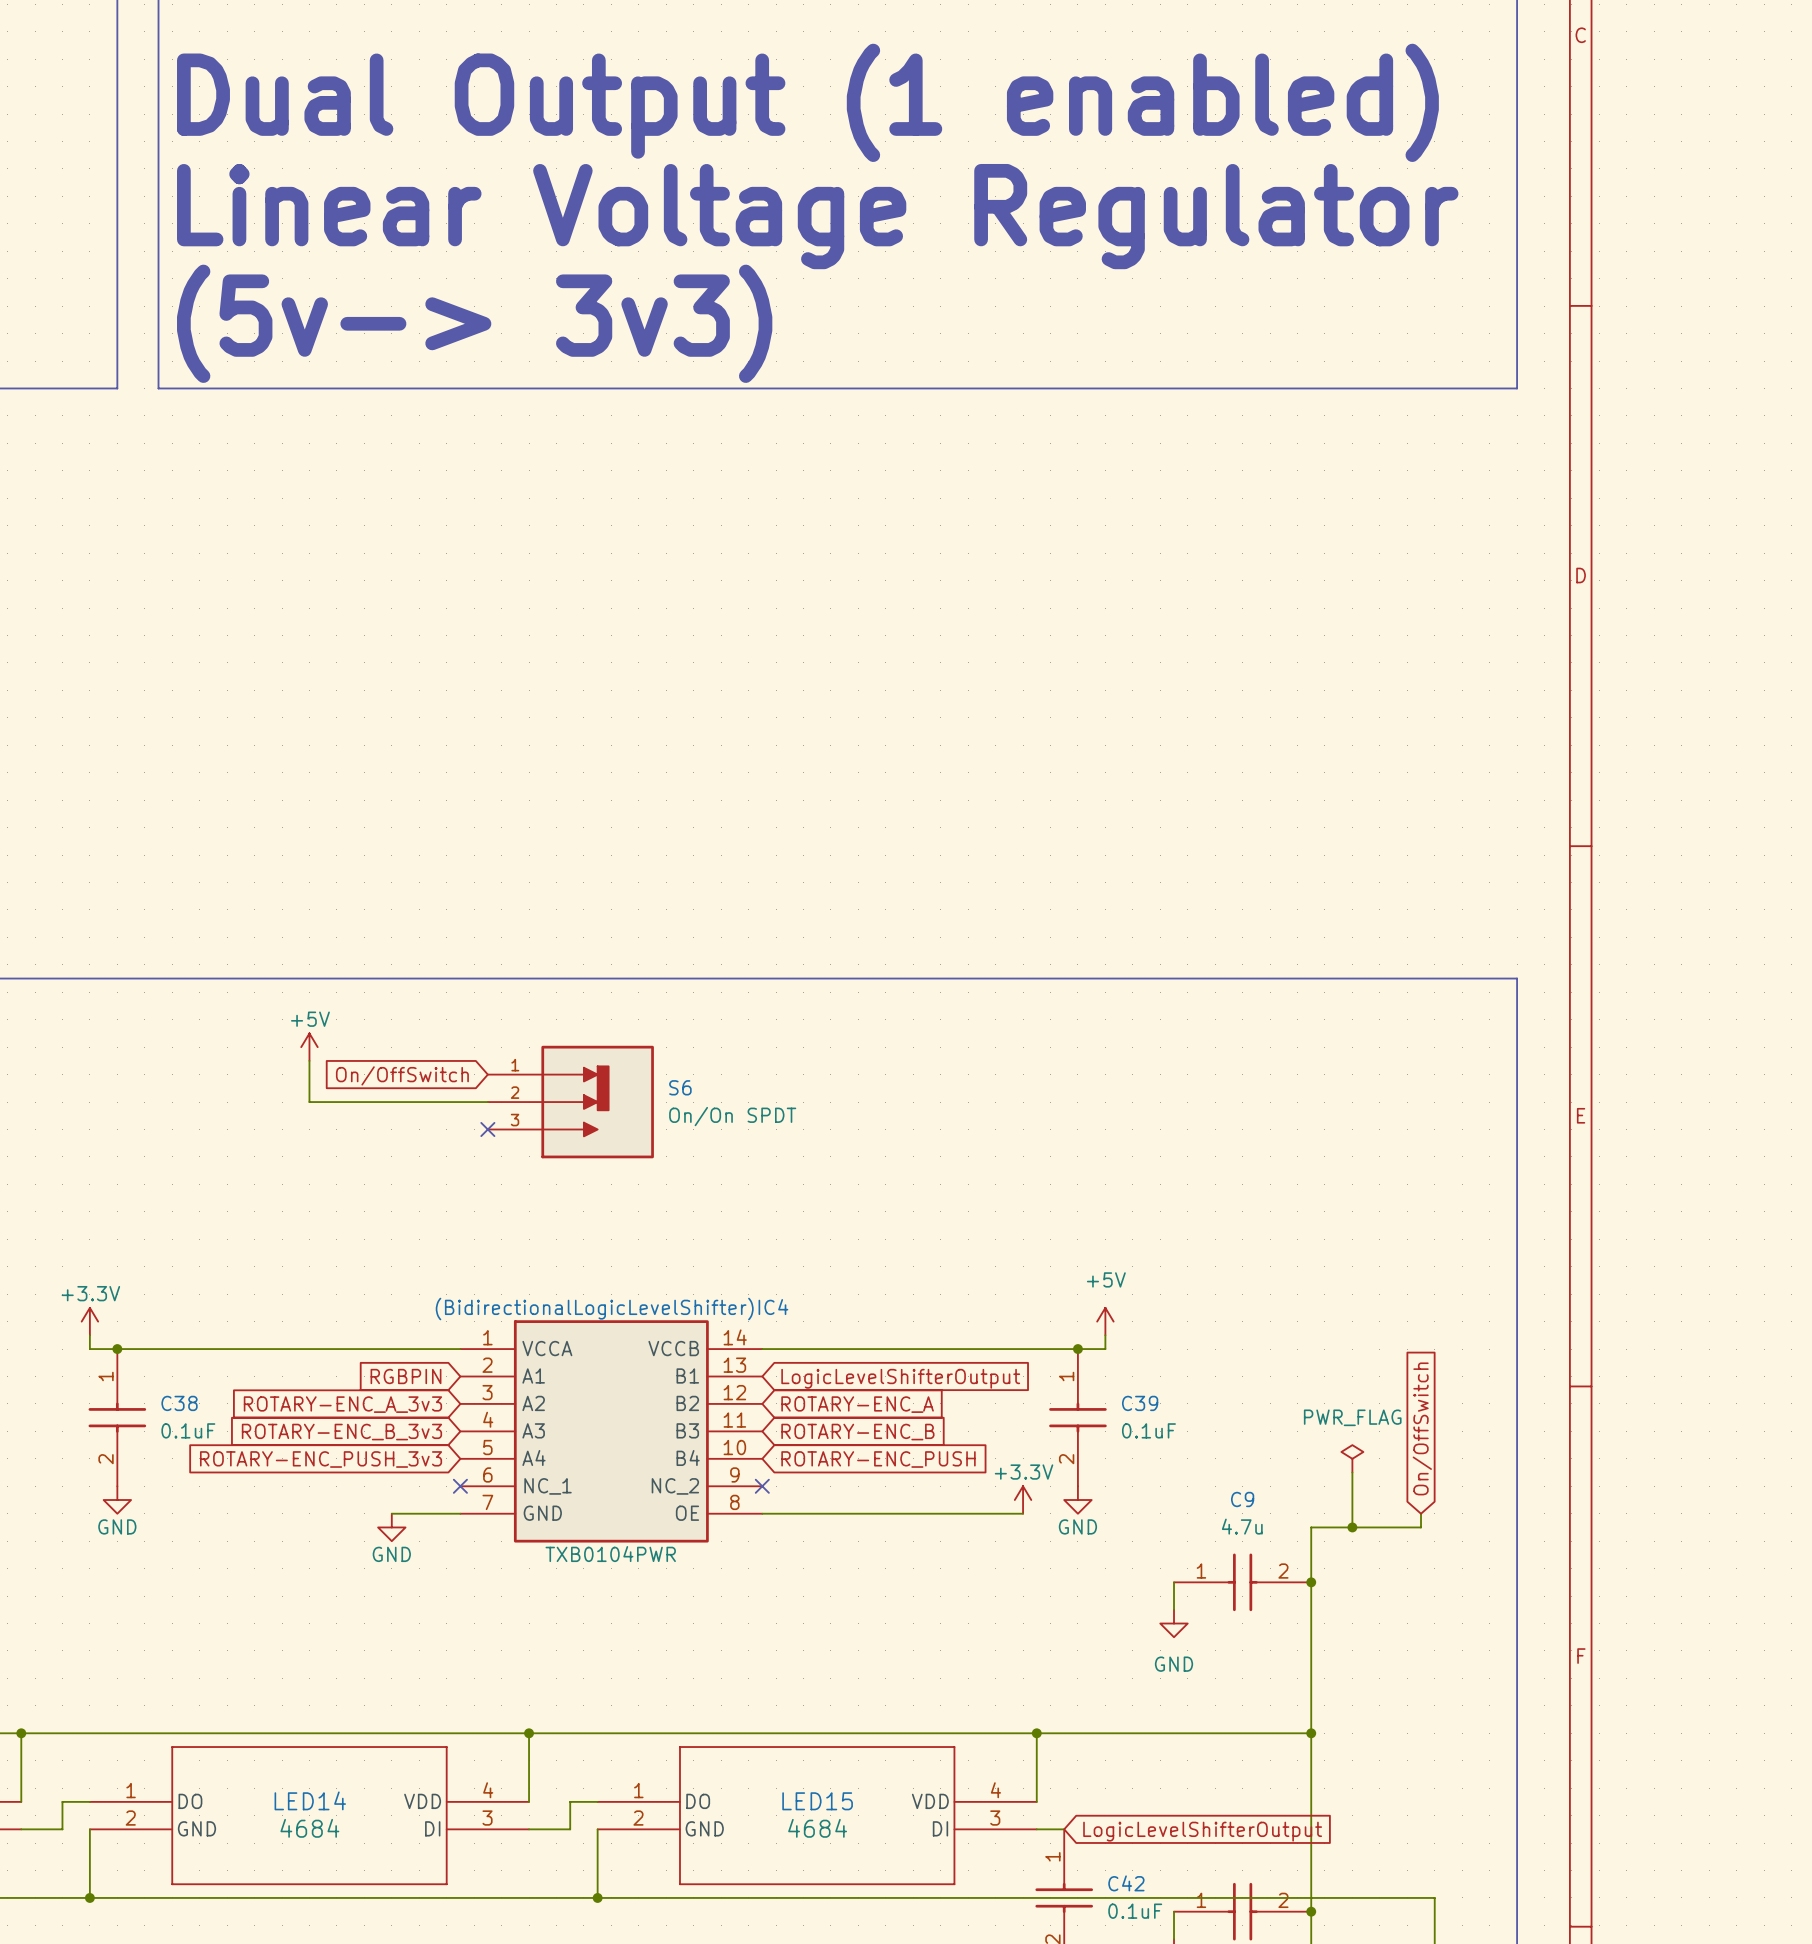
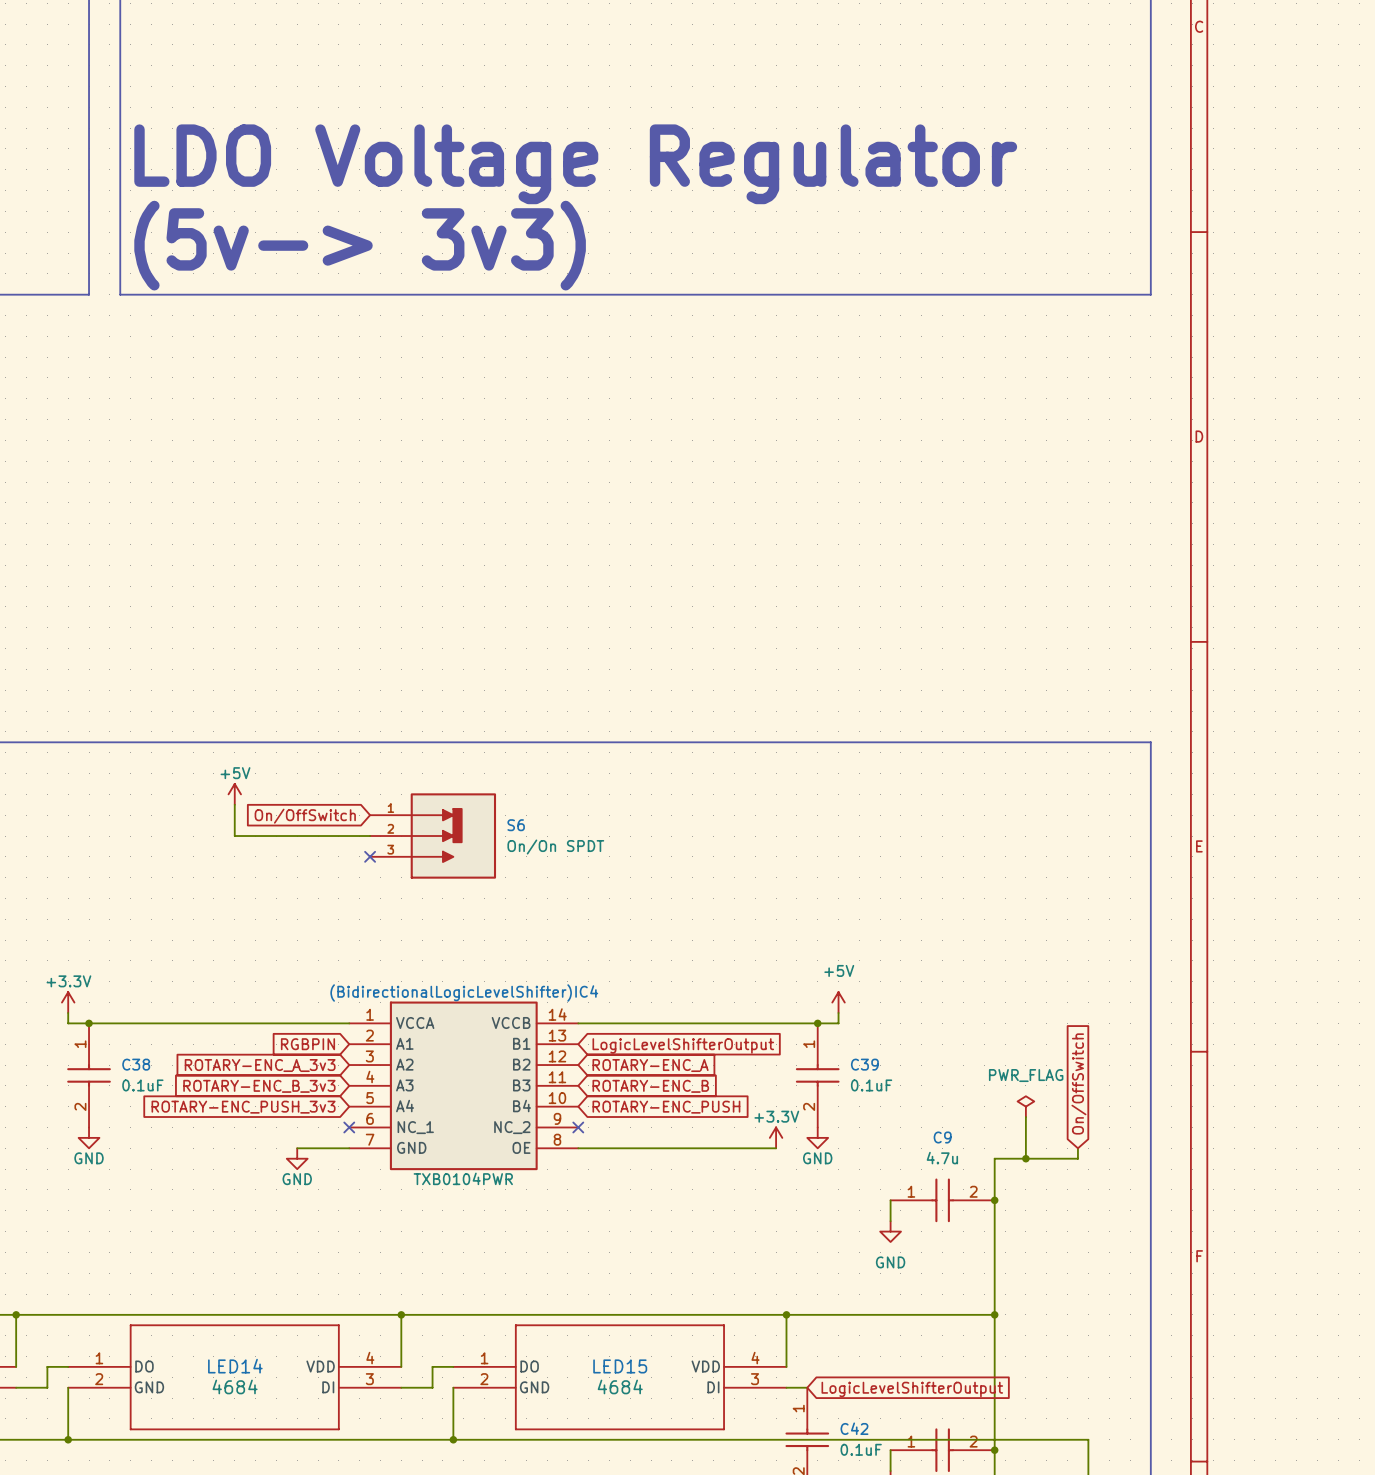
text: Dual Output (1 enabled) (807, 102) -> none
text: Linear Voltage Regulator (817, 216) -> LDO Voltage Regulator (575, 164)

